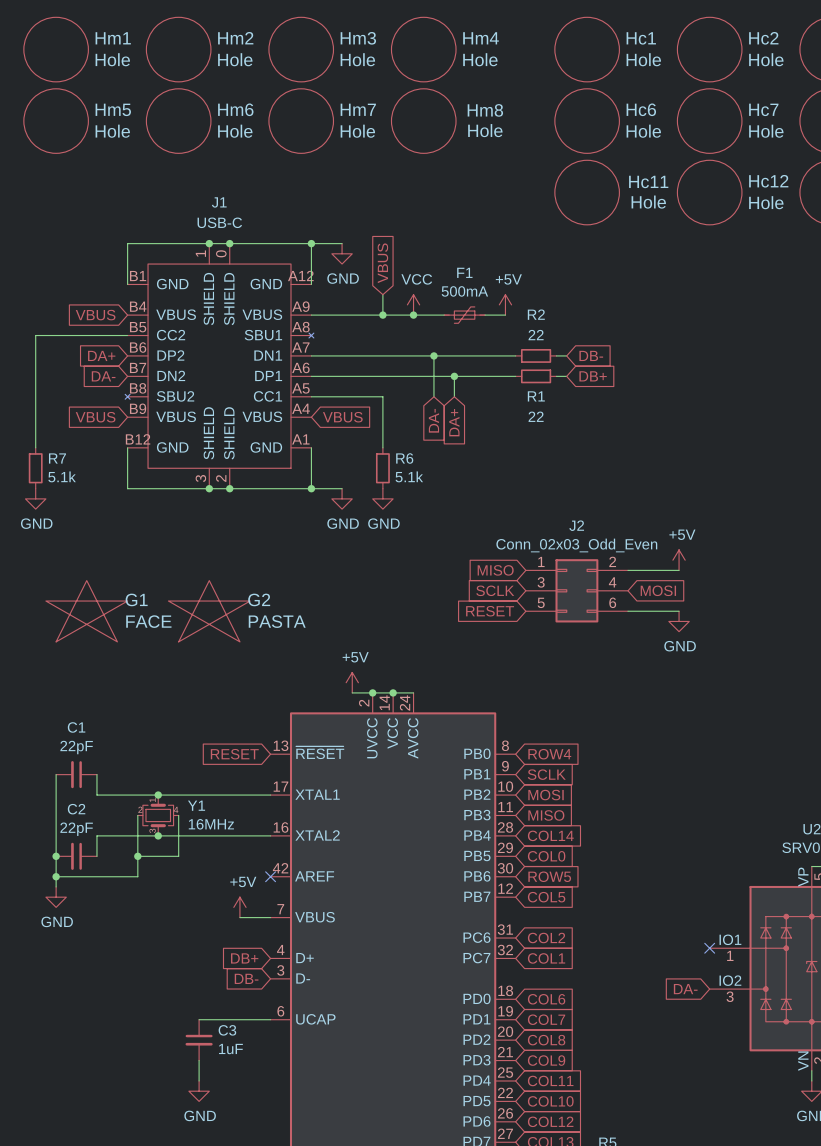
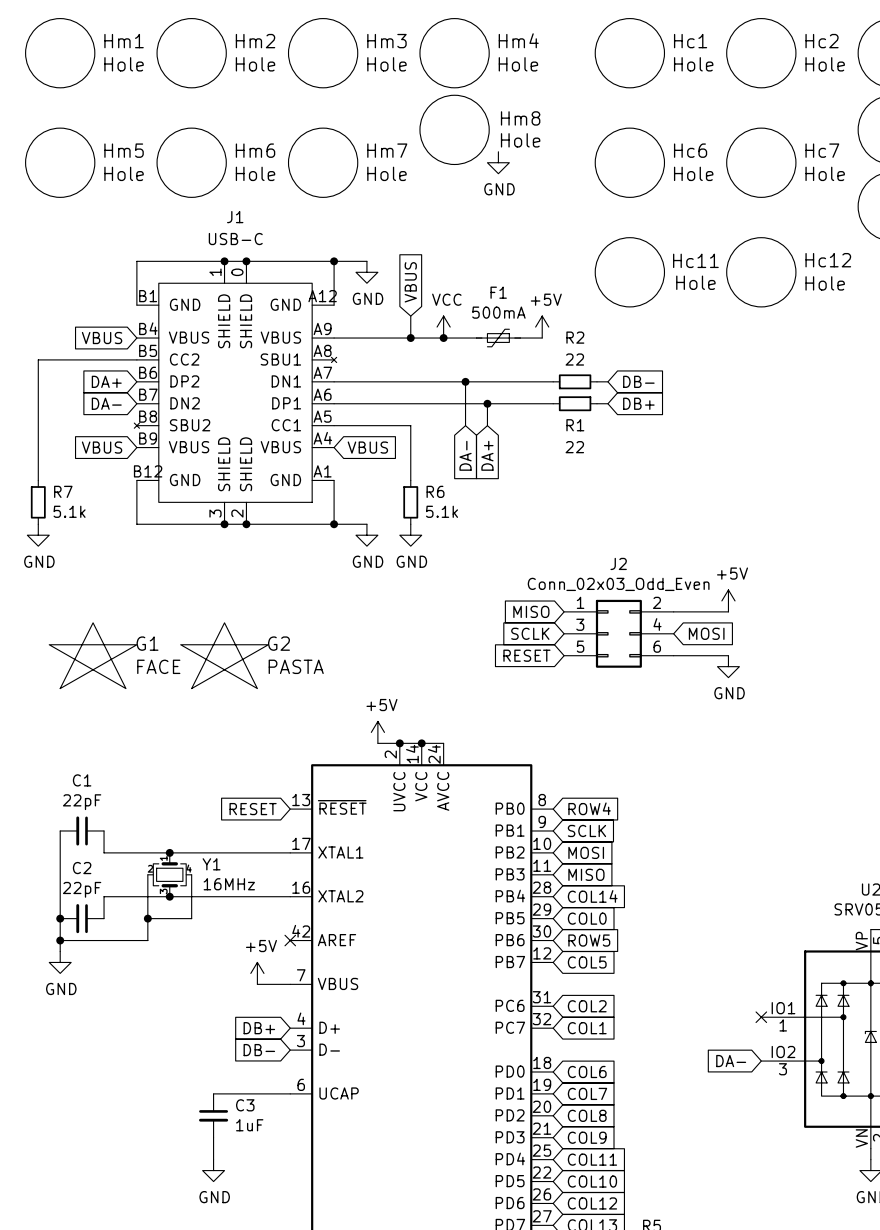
Hm5 position: (56, 121) -> (60, 162)
Hm6 position: (178, 121) -> (191, 162)
Hm7 position: (301, 121) -> (323, 162)
Hc6 position: (587, 121) -> (629, 162)
Hc7 position: (709, 121) -> (761, 162)
power symbol: none -> GND (498, 162)
Hc11 position: (587, 192) -> (629, 272)
Hc12 position: (709, 192) -> (761, 272)

